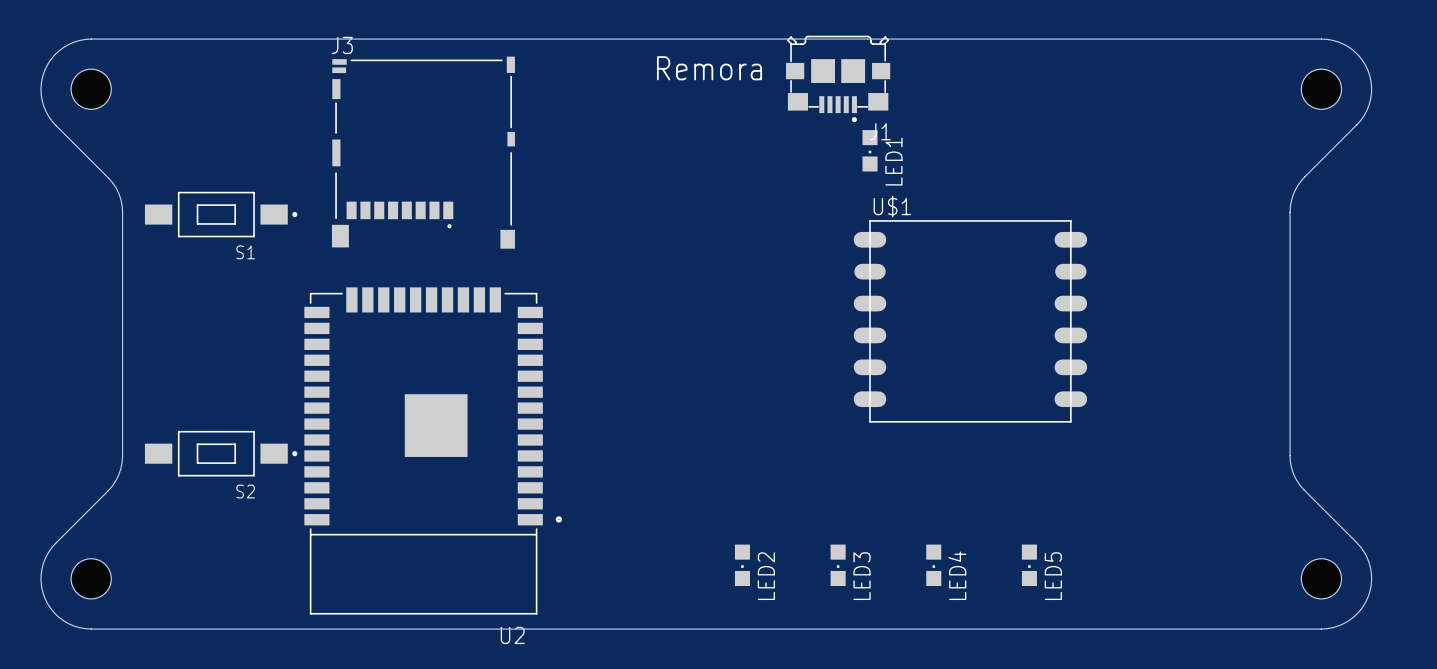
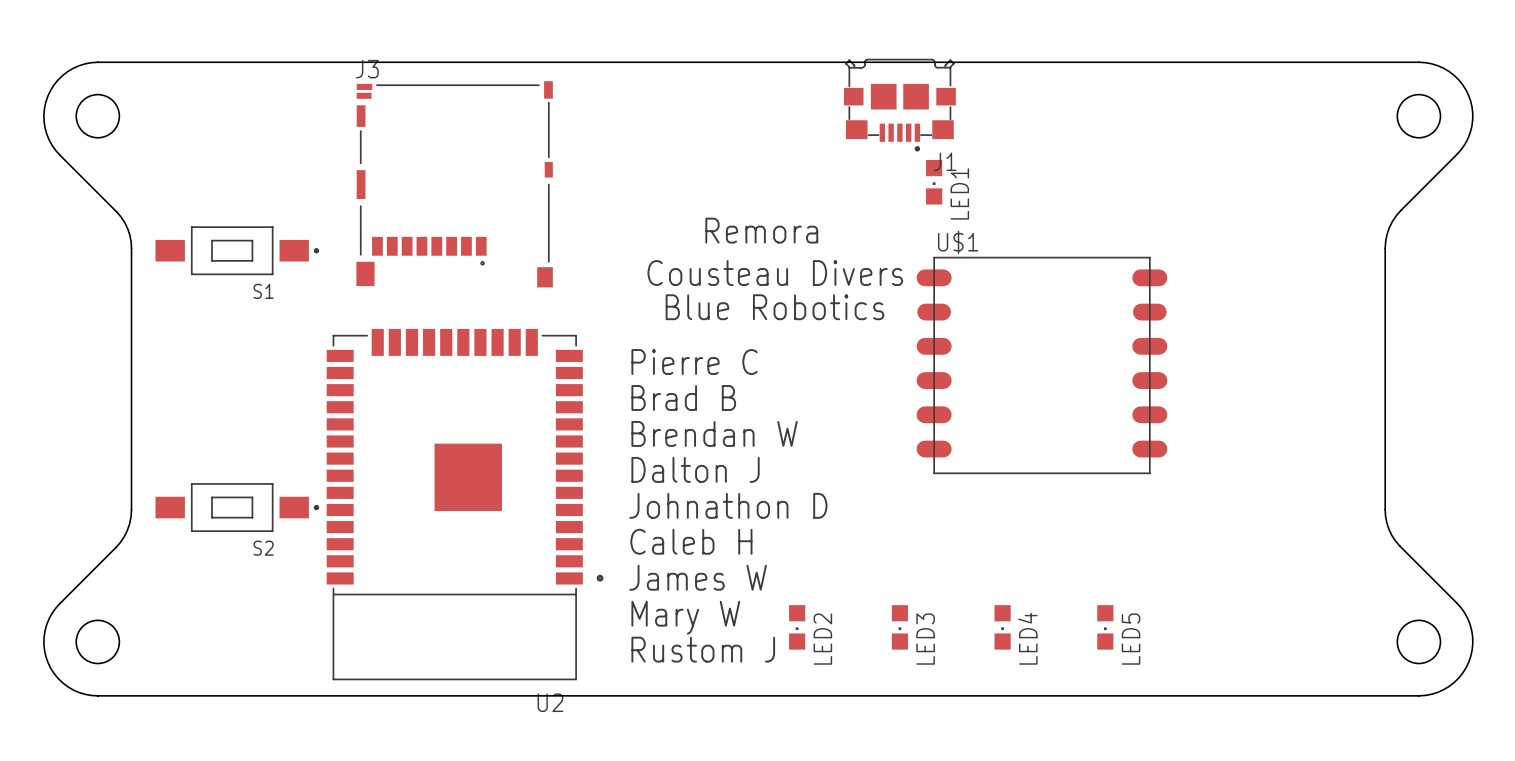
text position: Remora (709, 68) -> Remora (761, 230)
text: none -> Cousteau Divers (775, 273)
text: none -> Blue Robotics (774, 307)
text: none -> Pierre C (694, 362)
text: none -> Brad B (683, 397)
text: none -> Brendan W (714, 433)
text: none -> Dalton J (695, 469)
text: none -> Johnathon D (728, 505)
text: none -> Caleb H (691, 541)
text: none -> James W (698, 577)
text: none -> Mary W (685, 617)
text: none -> Rustom J (703, 649)

